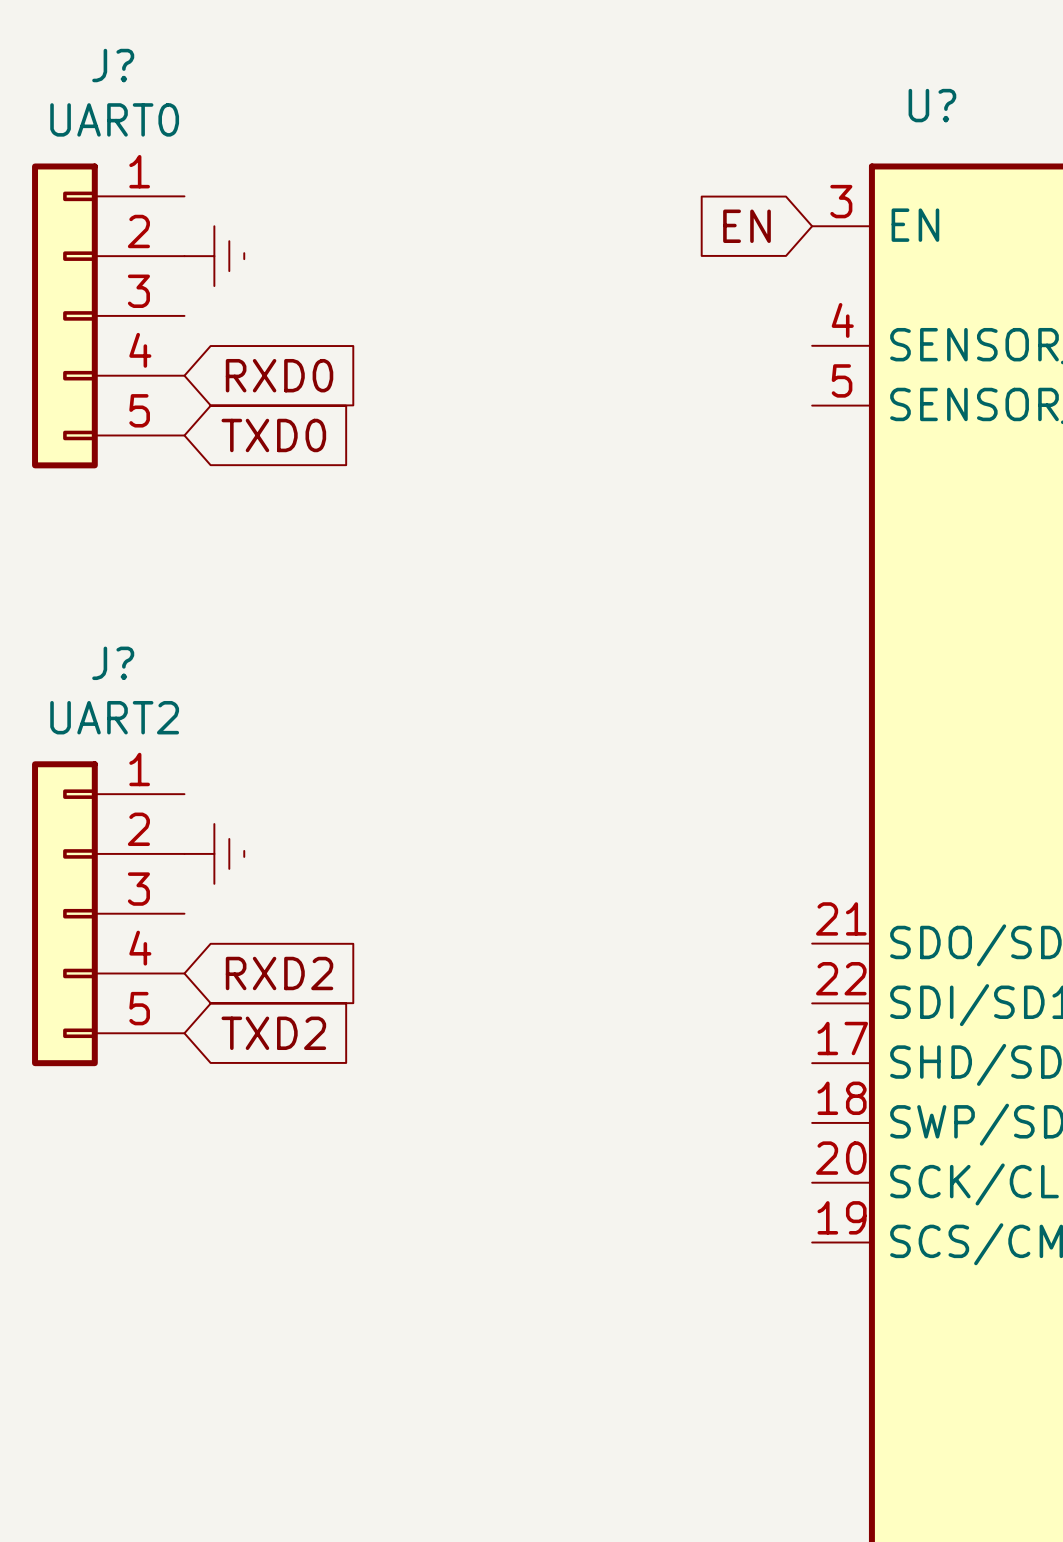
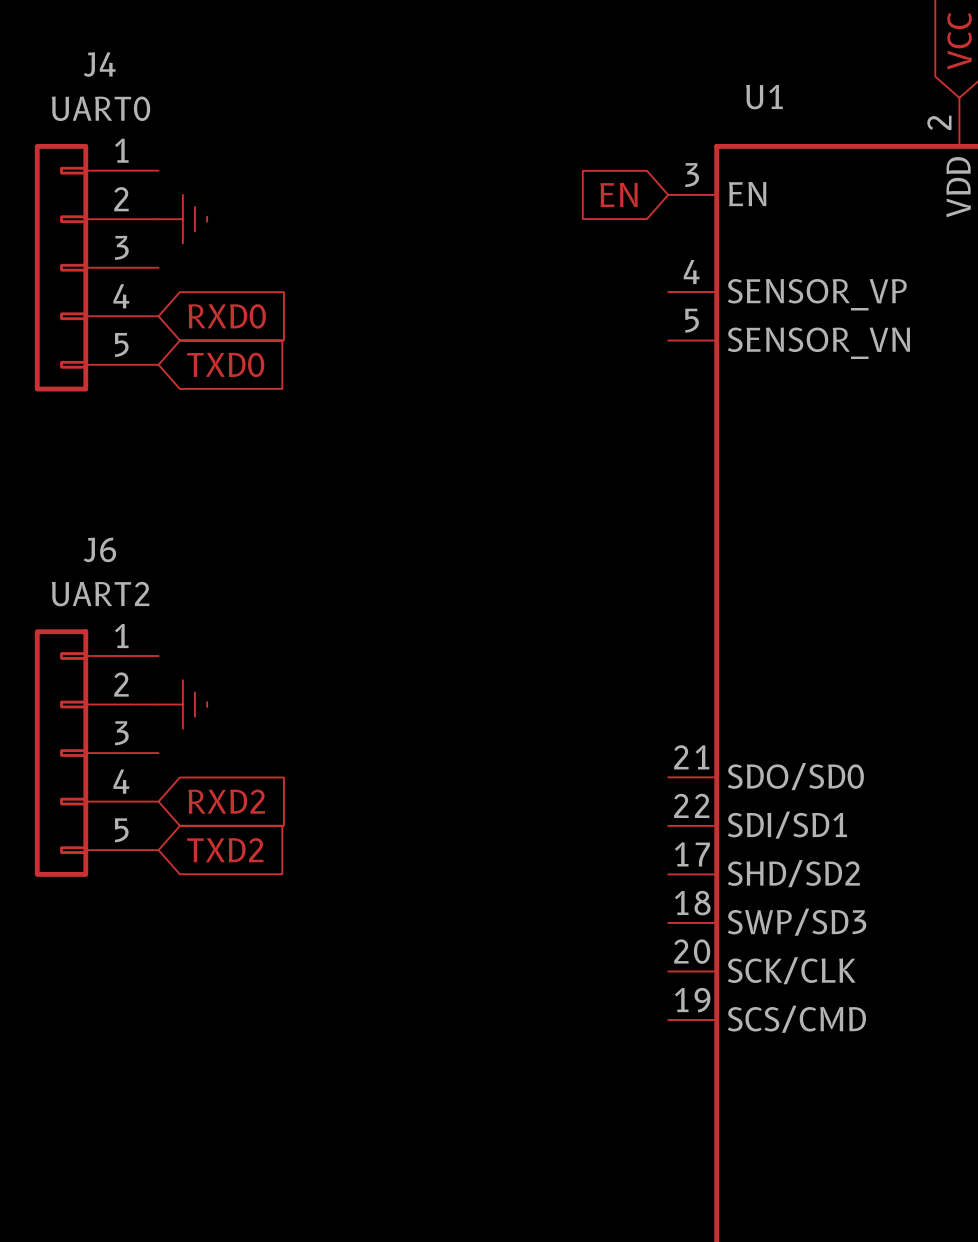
J? name: J? (113, 65) -> J4 (99, 64)
U? name: U? (932, 105) -> U1 (764, 97)
J? name: J? (113, 663) -> J6 (99, 549)

